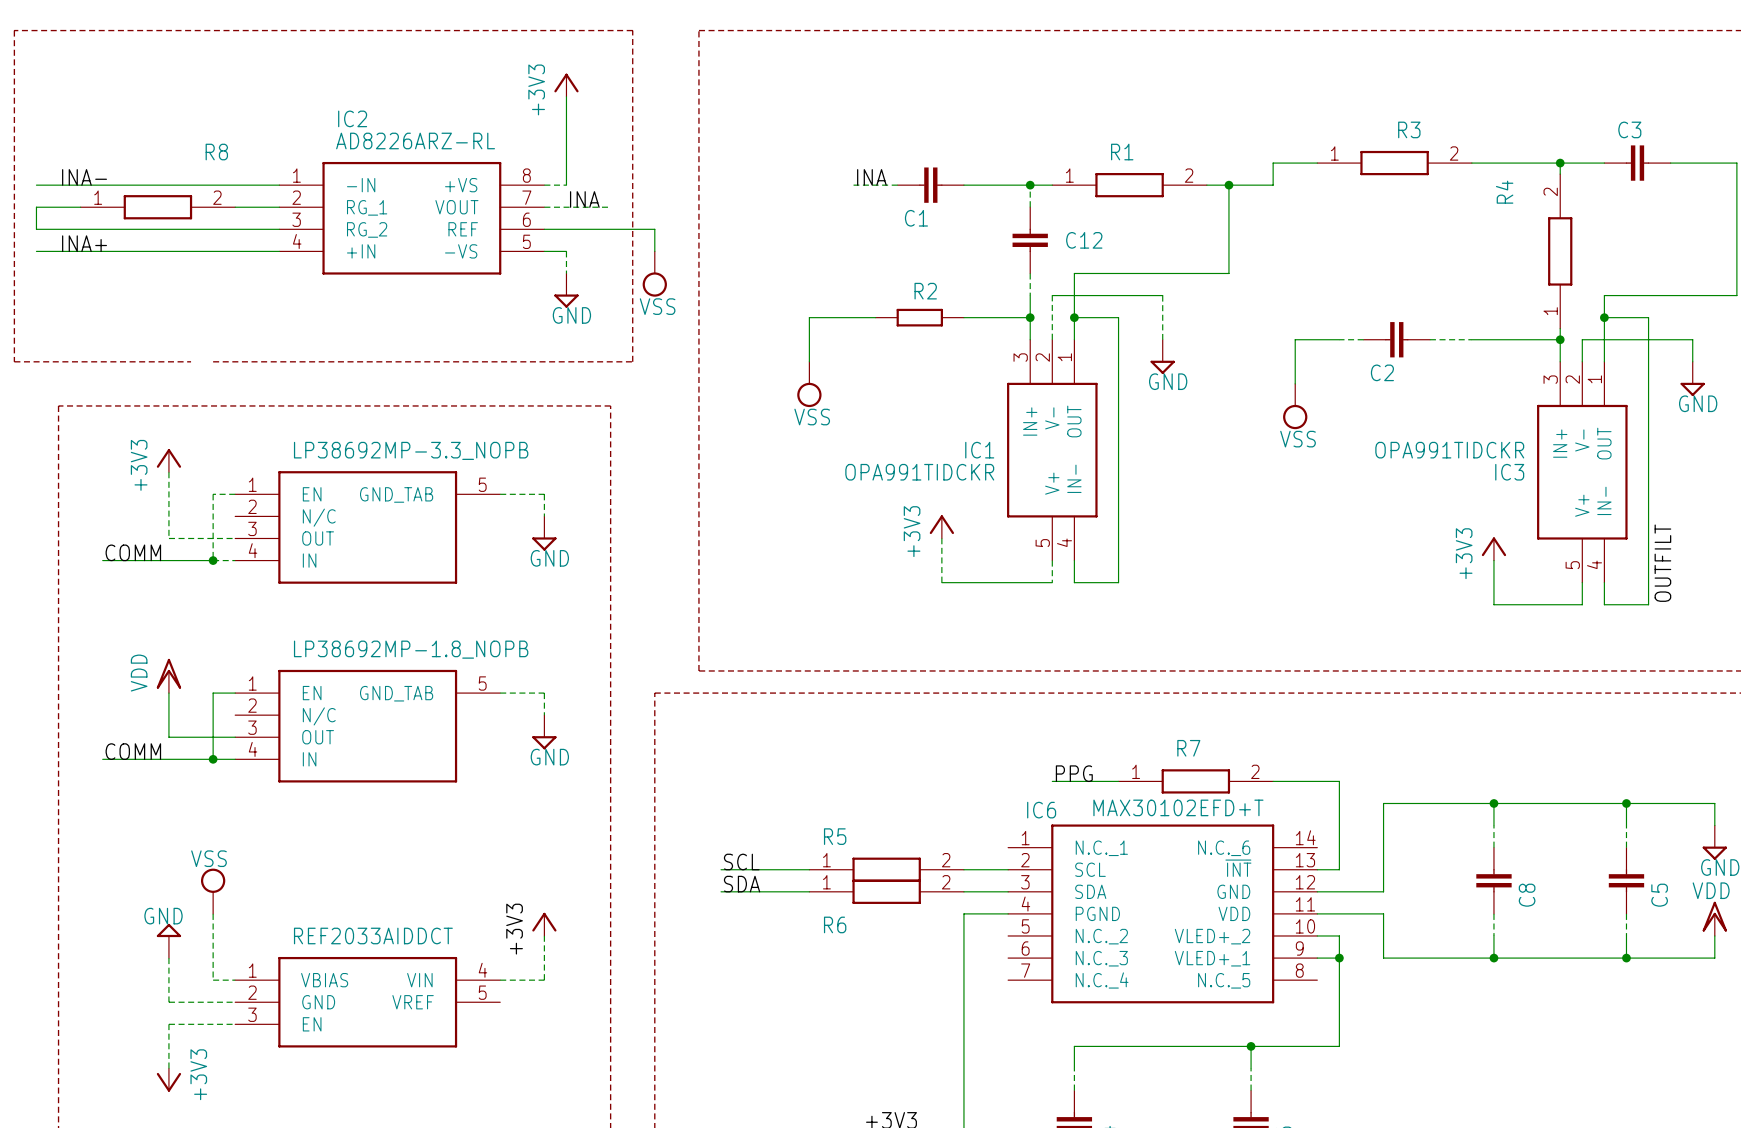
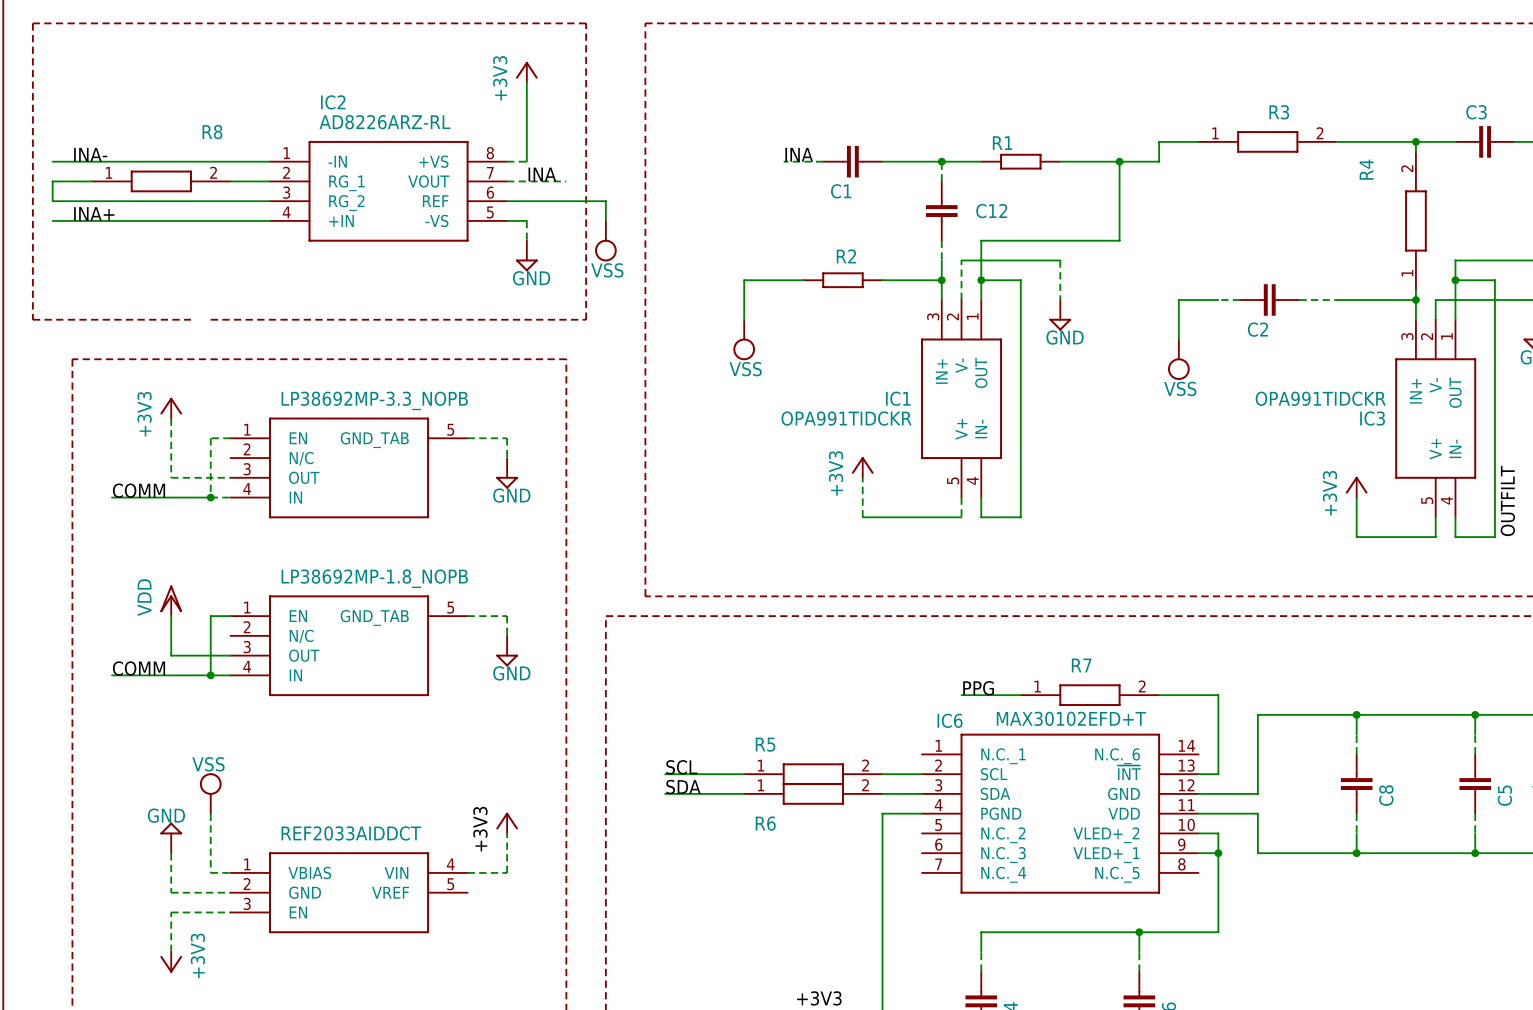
R1 symbol: [1052, 173, 1207, 198] -> [981, 153, 1061, 170]

